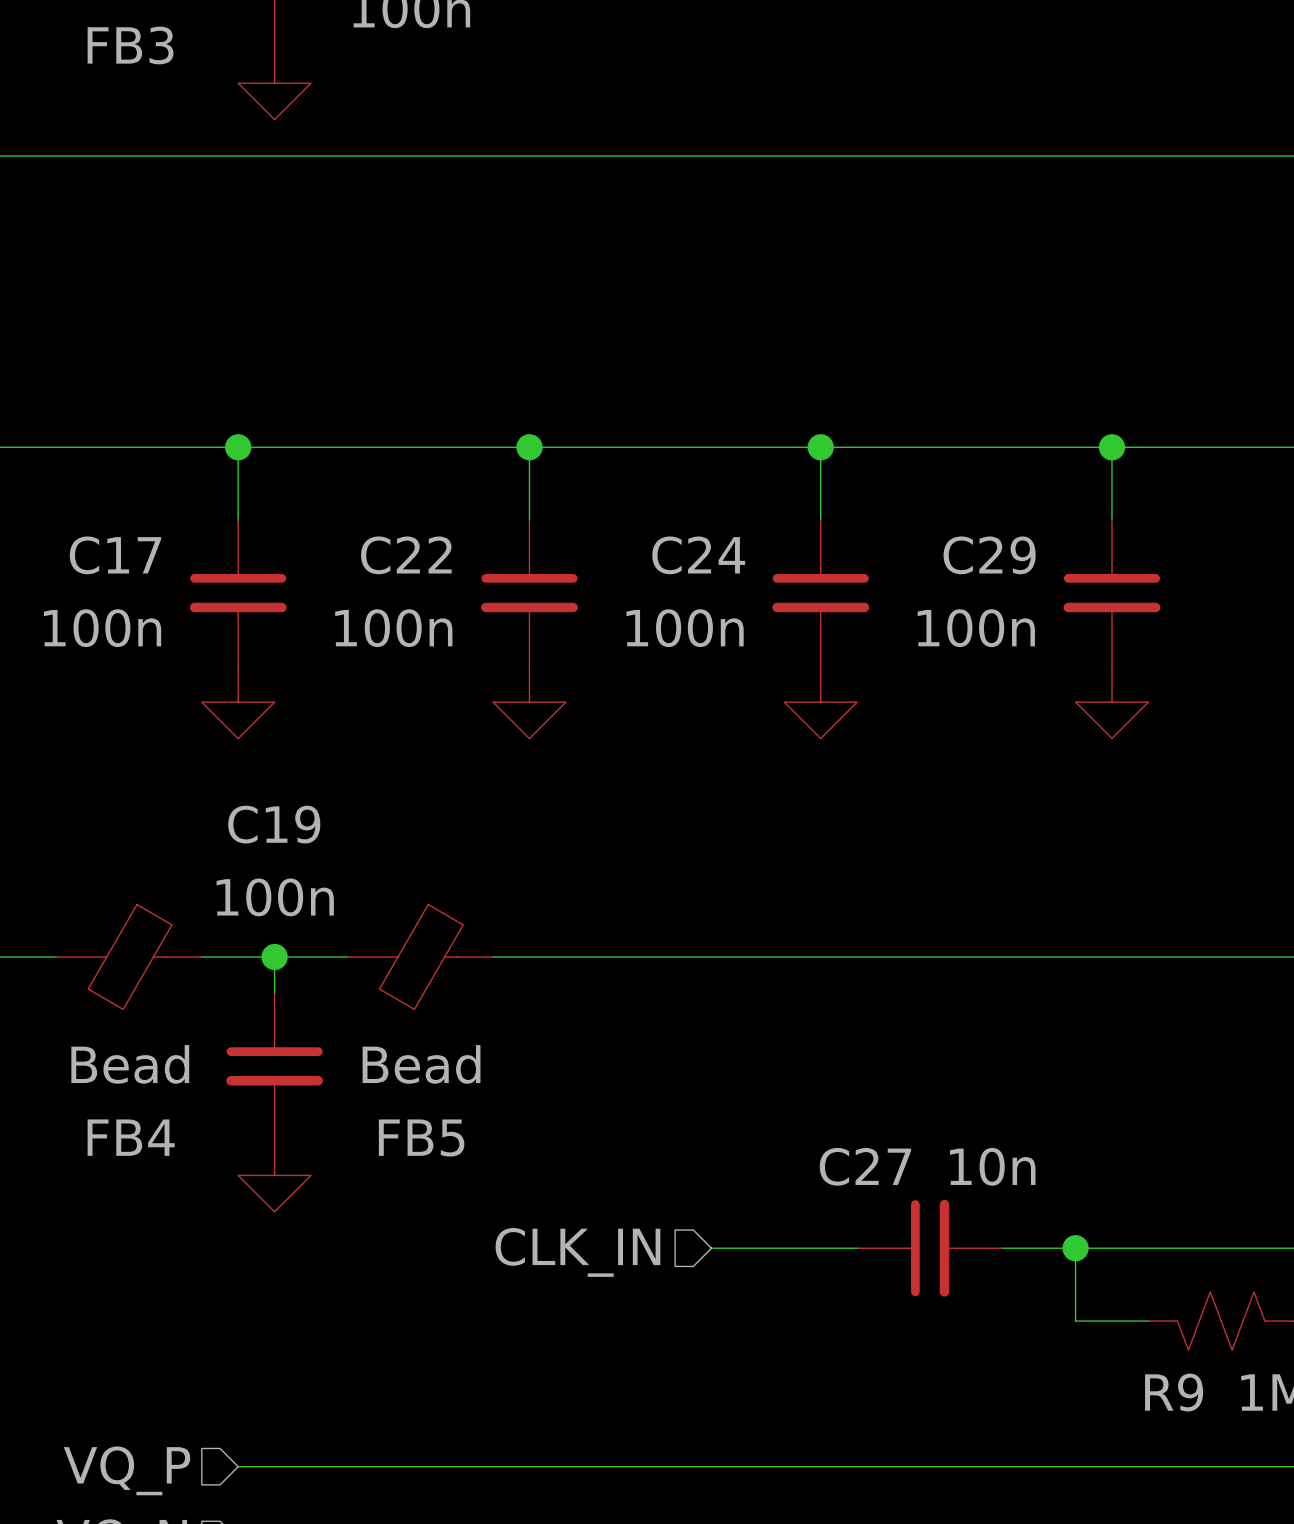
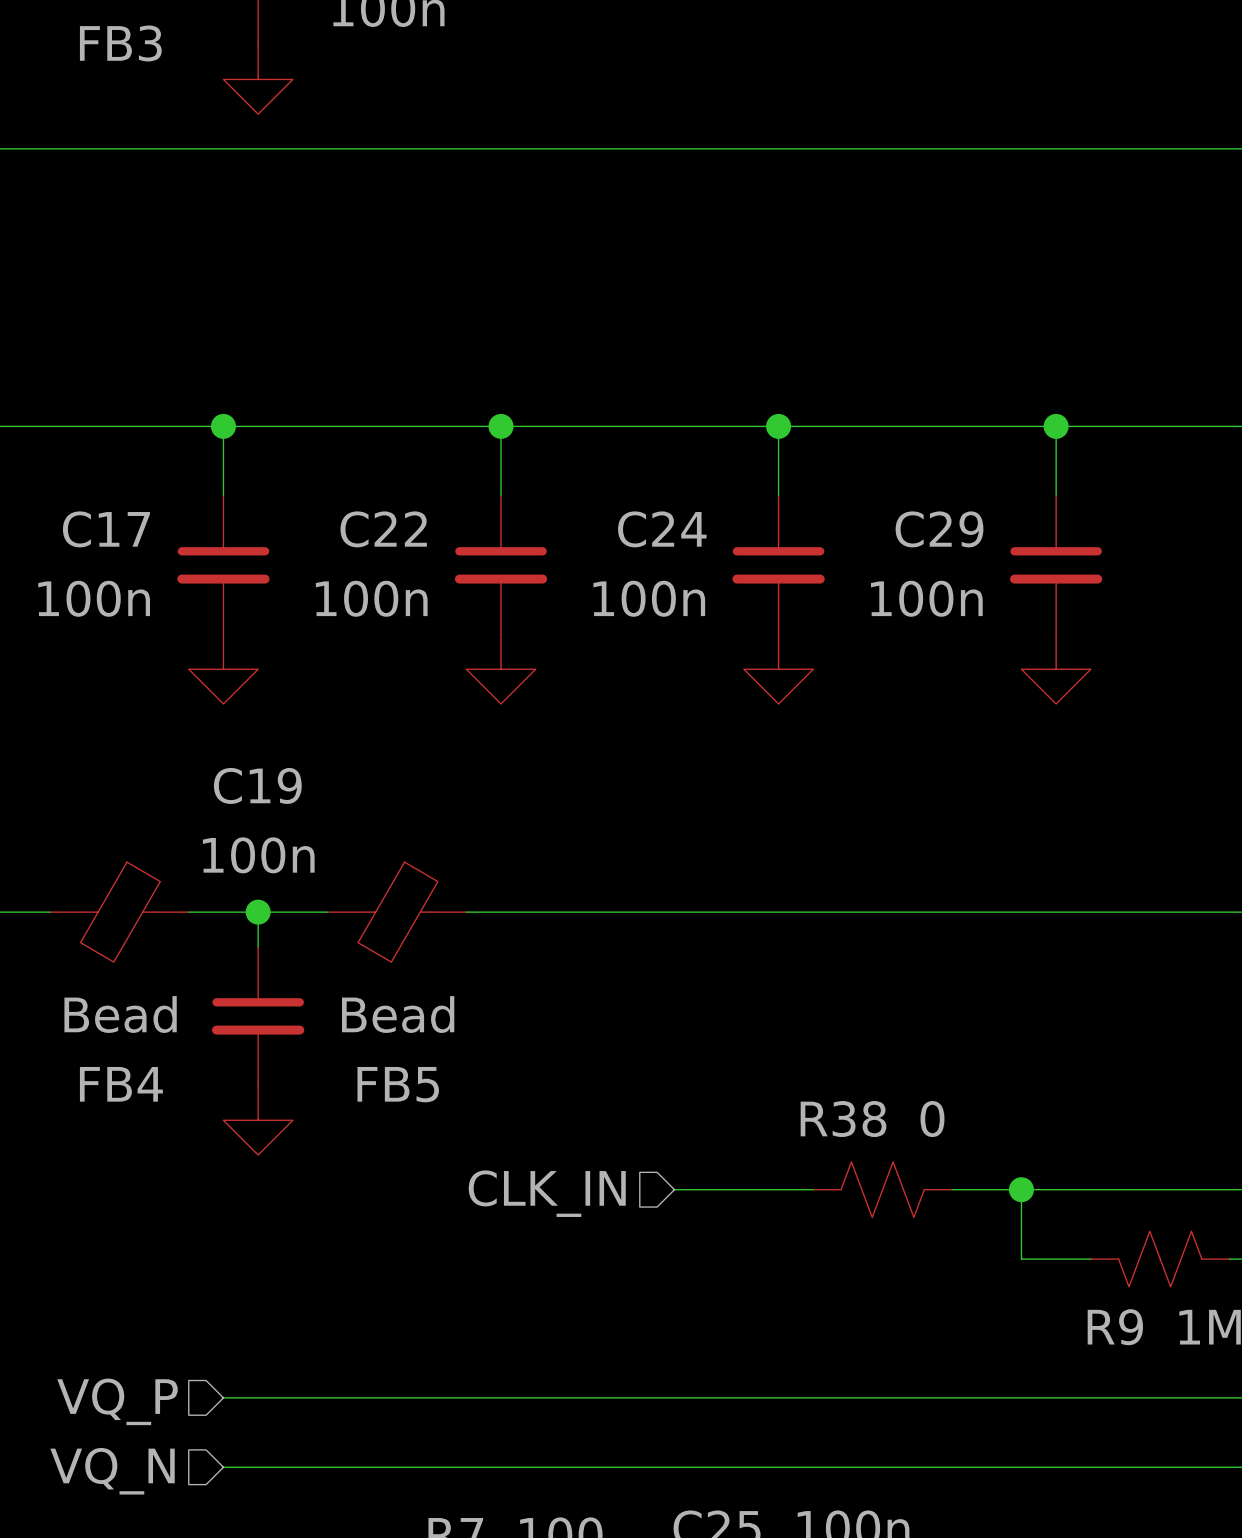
C27: 10n (929, 1248) -> none
R38: none -> 0 (882, 1189)

